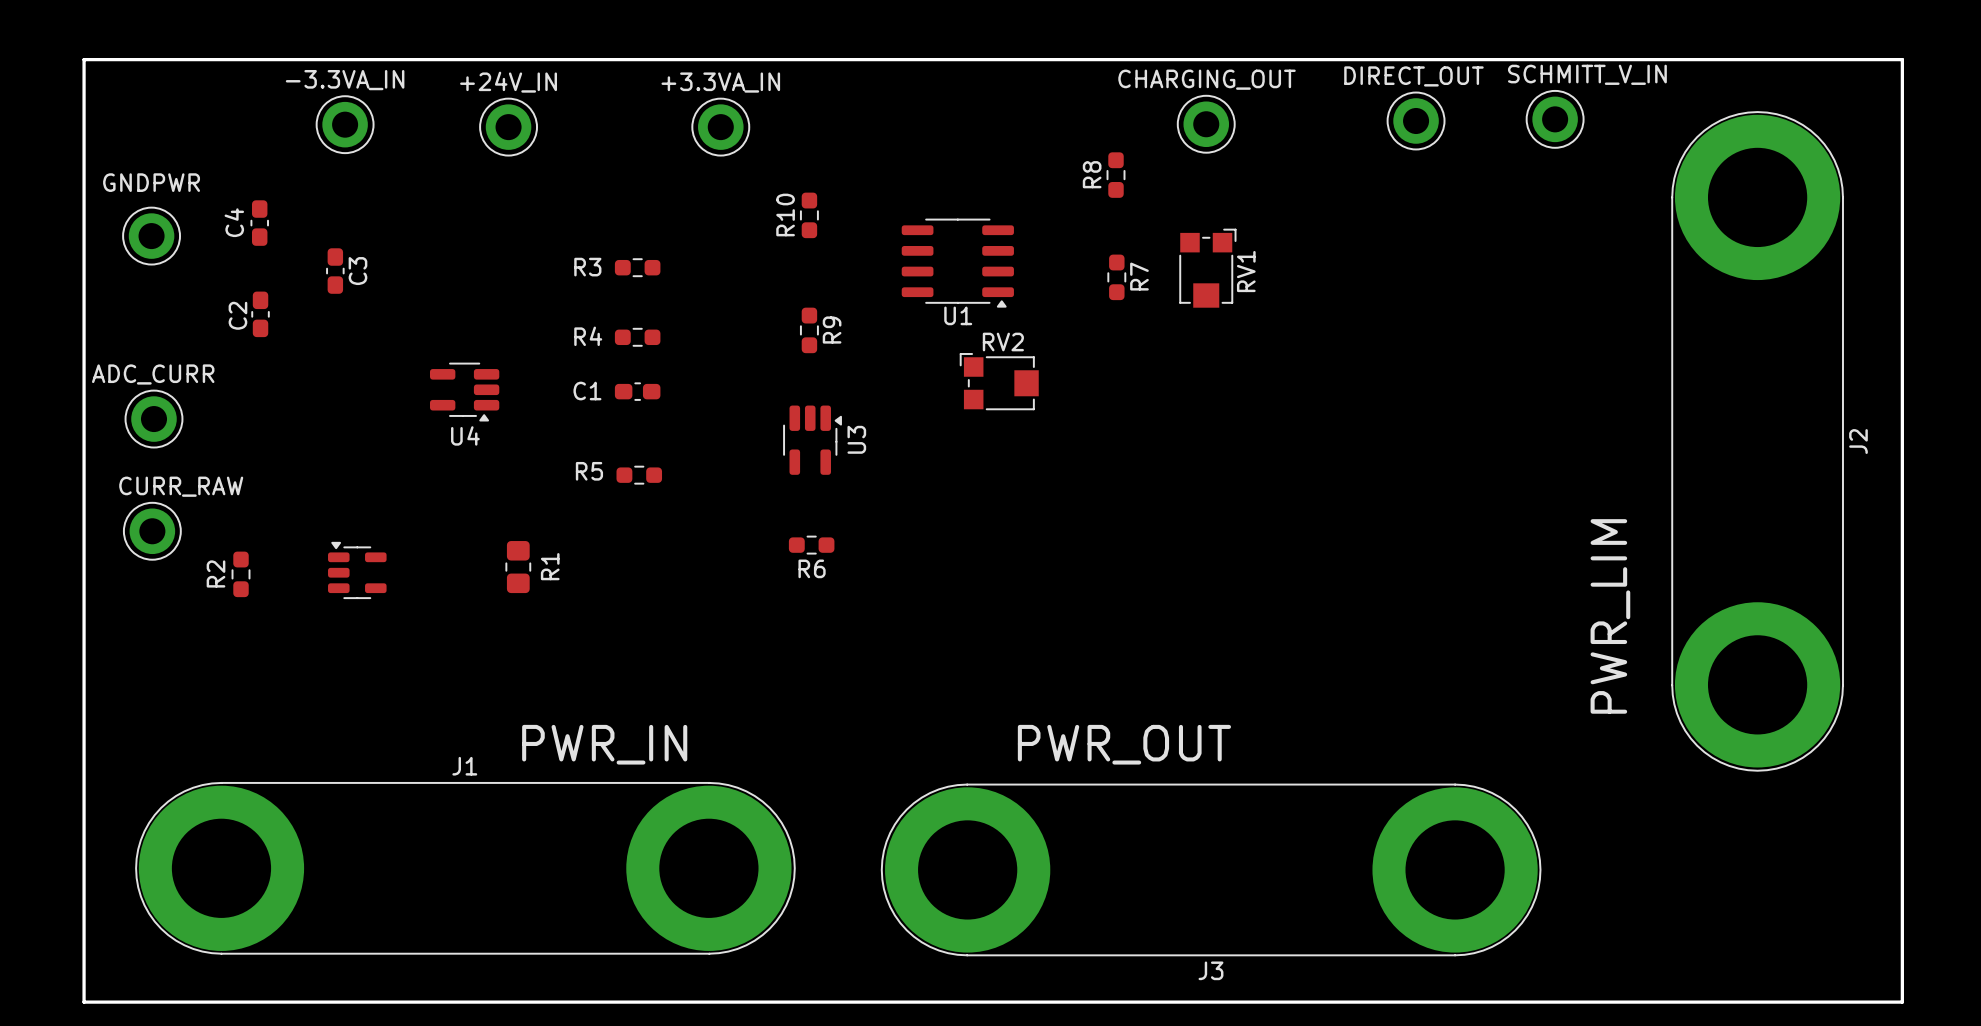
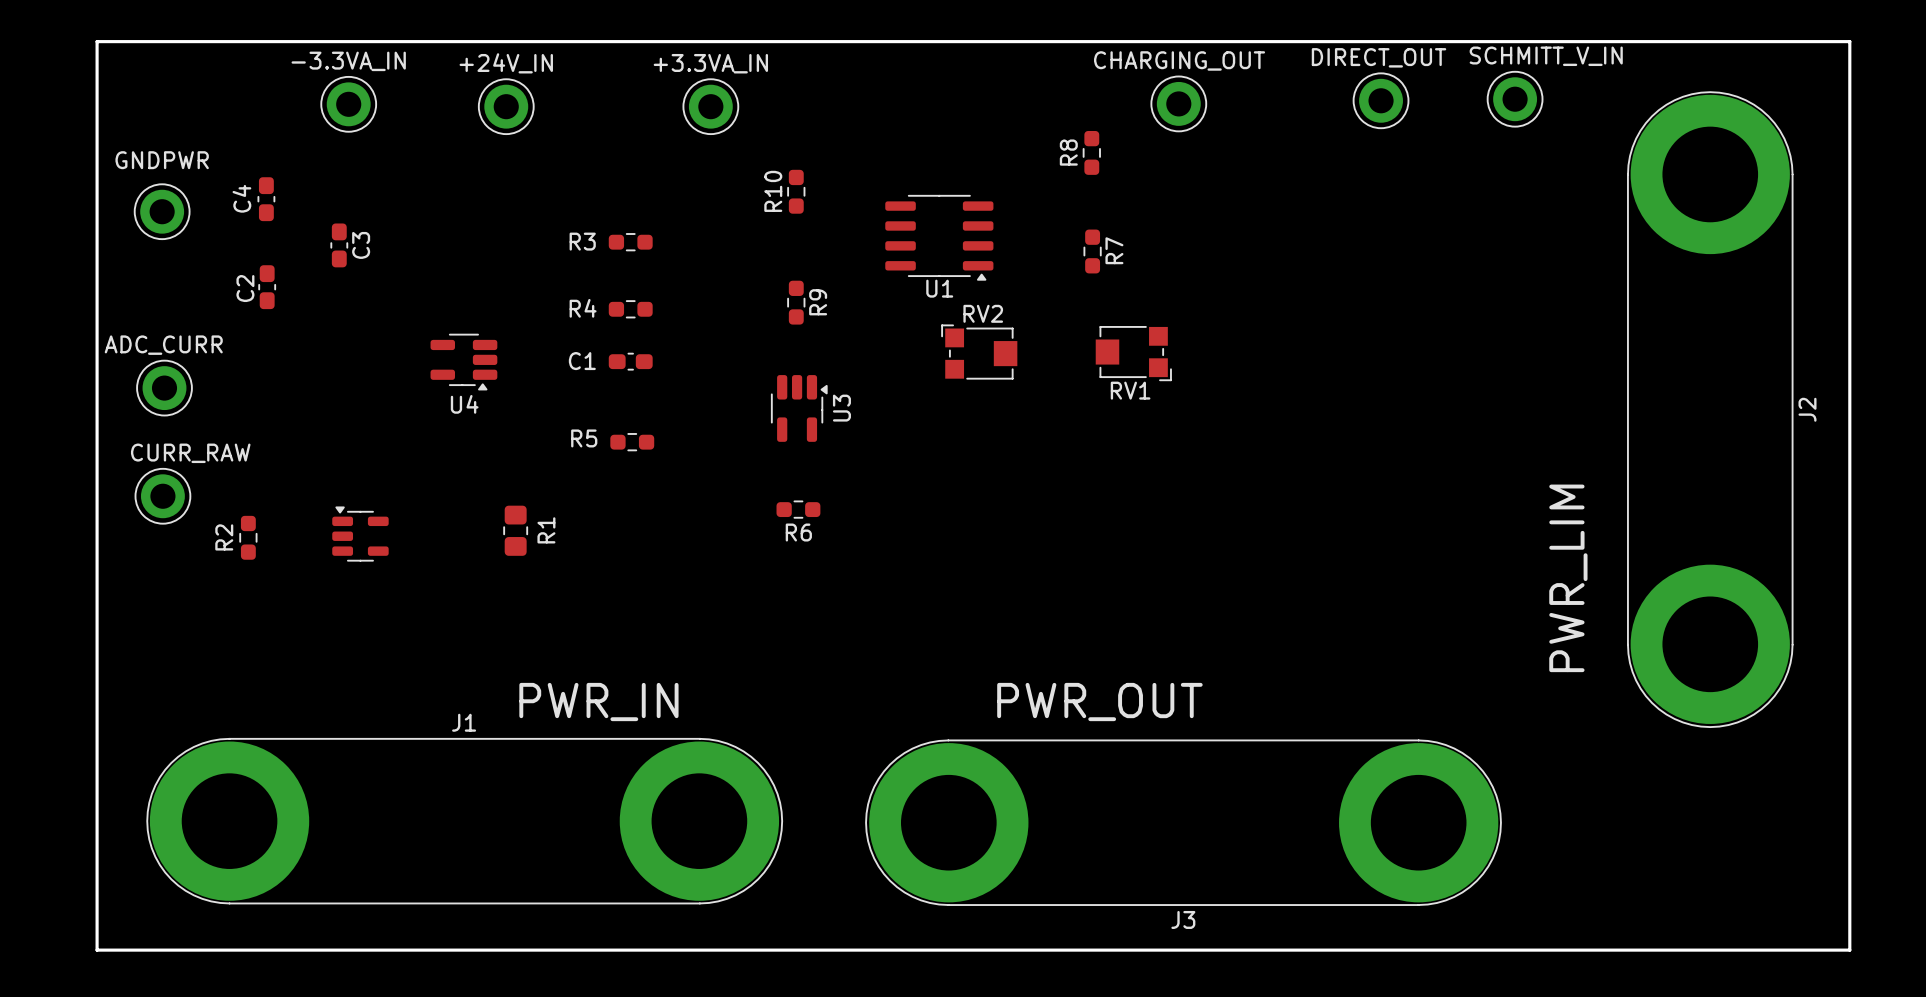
RV1 rotation: 0° (1207, 268) -> 90° clockwise (1133, 353)
RV1 position: (1207, 268) -> (1133, 353)

